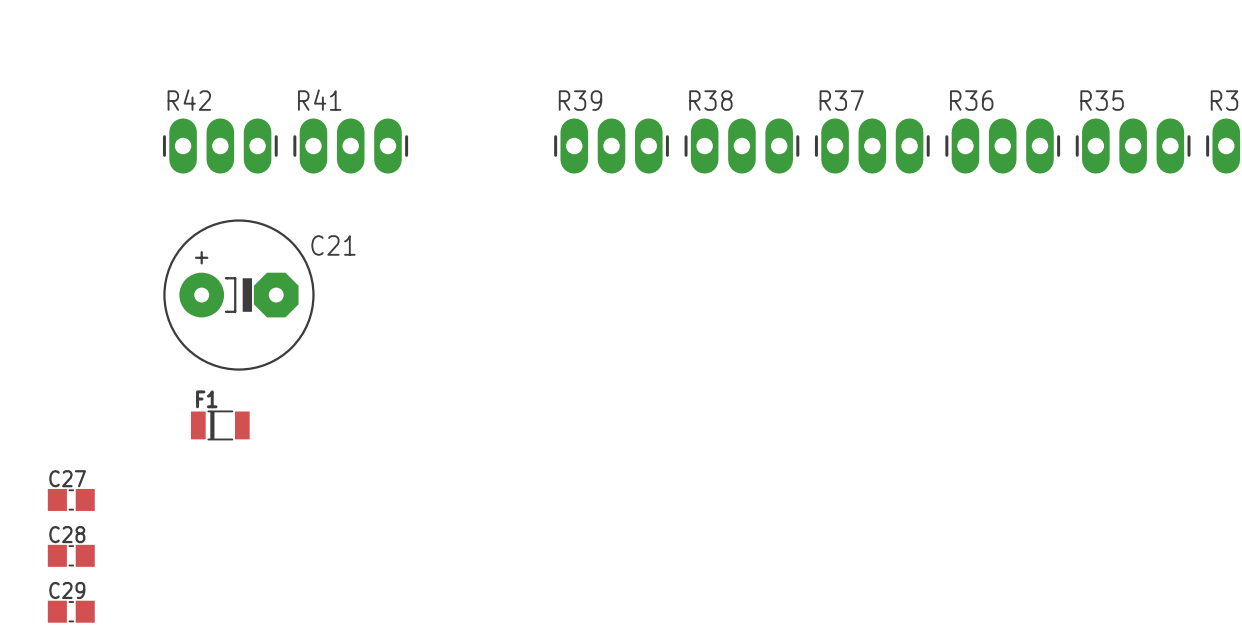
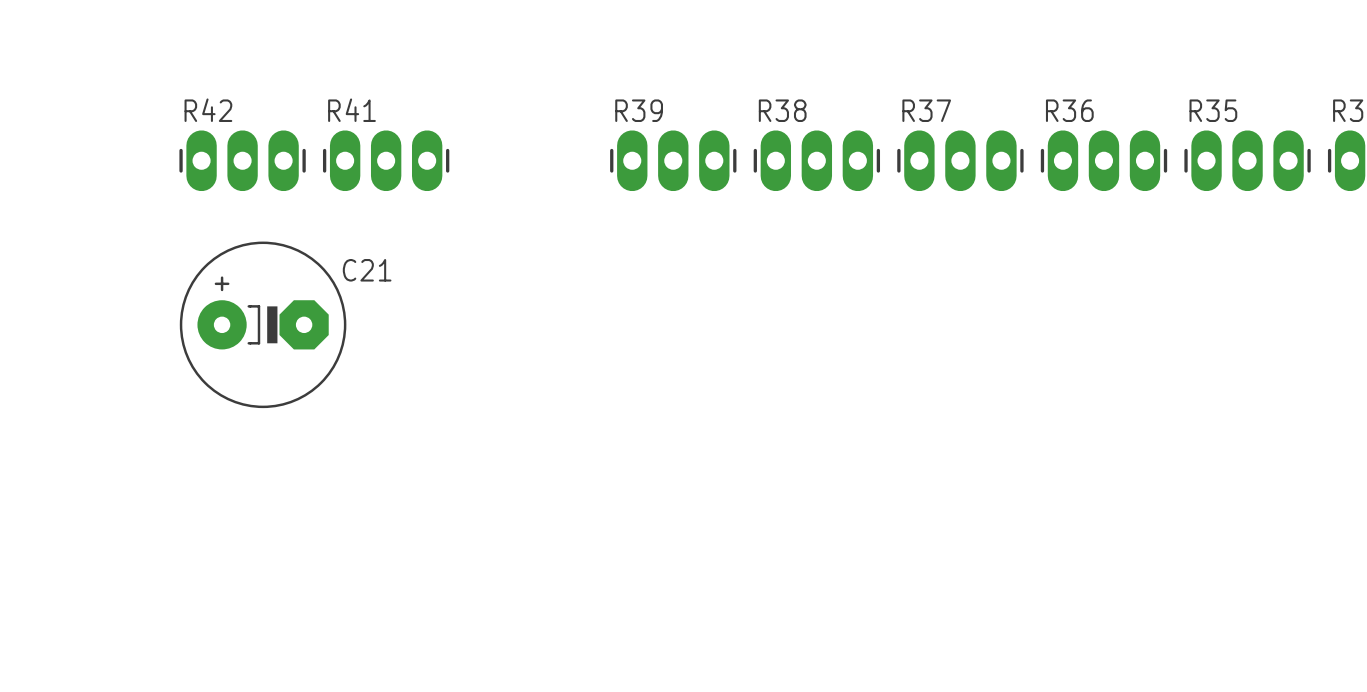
F1: (220, 425) -> none
C27: (71, 499) -> none
C28: (71, 555) -> none
C29: (71, 611) -> none

